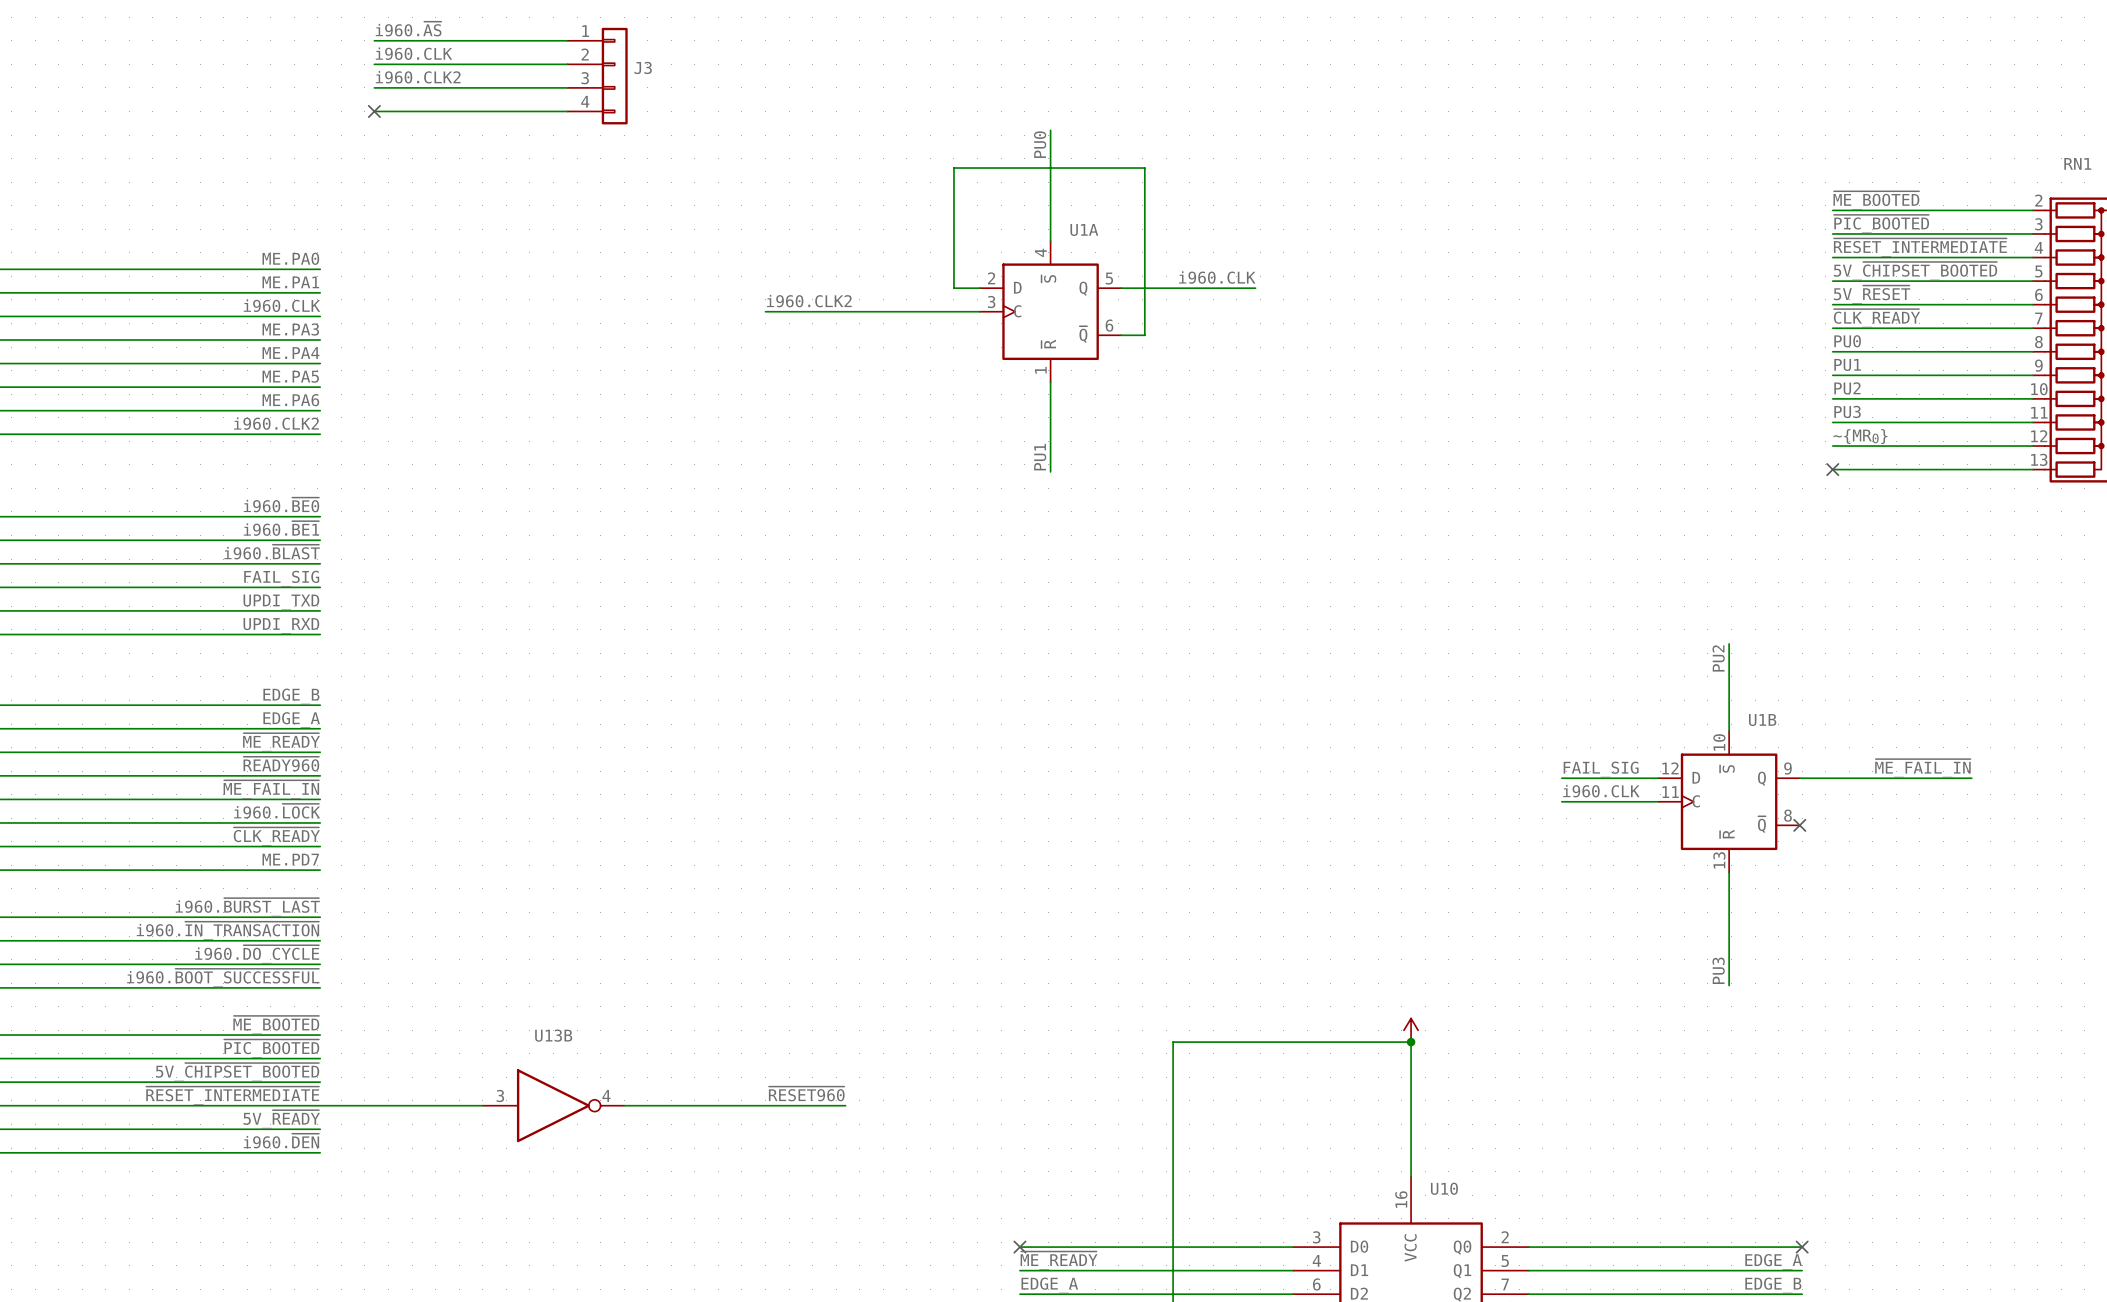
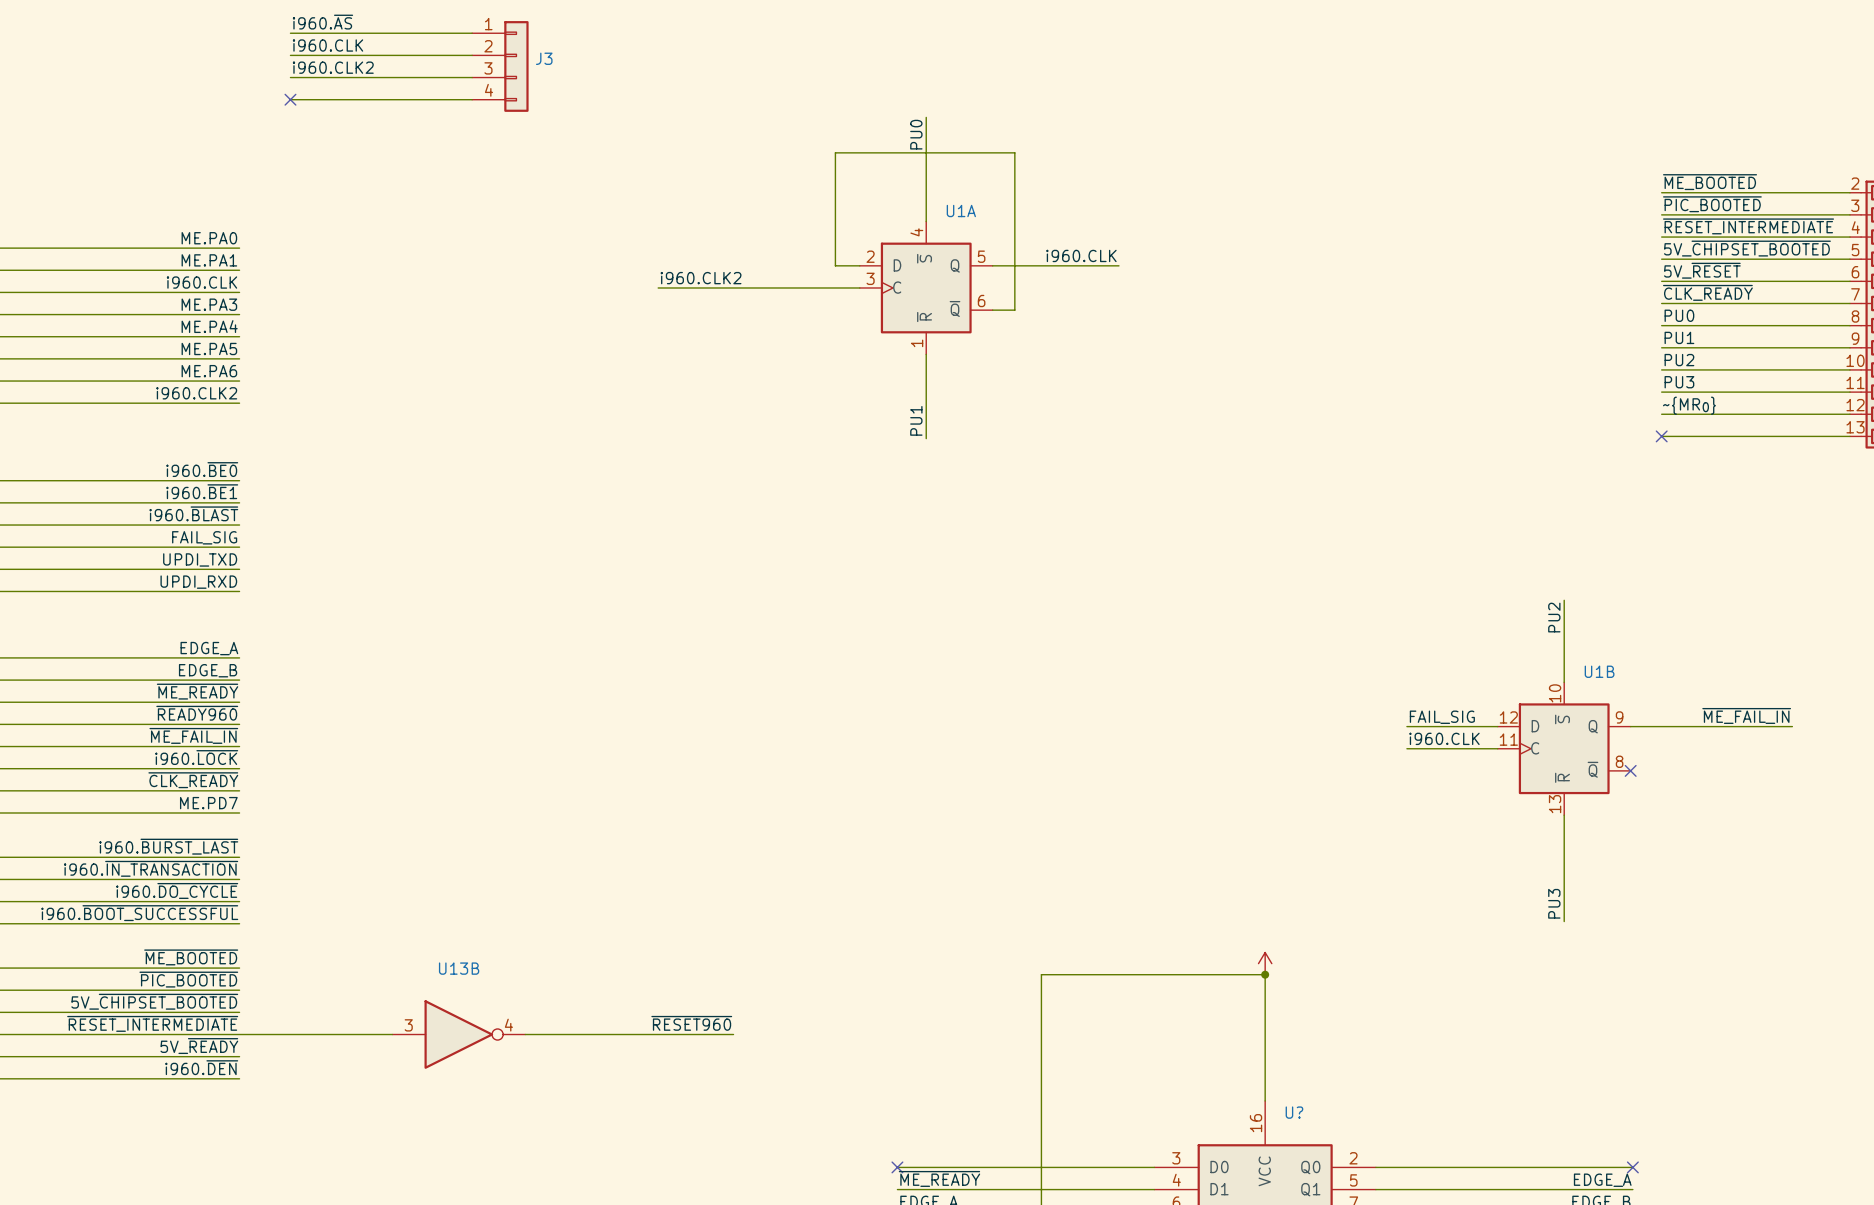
label: EDGE_B (291, 696) -> EDGE_A (209, 648)
label: EDGE_A (291, 720) -> EDGE_B (208, 670)
U10 name: U10 (1444, 1188) -> U? (1294, 1112)

